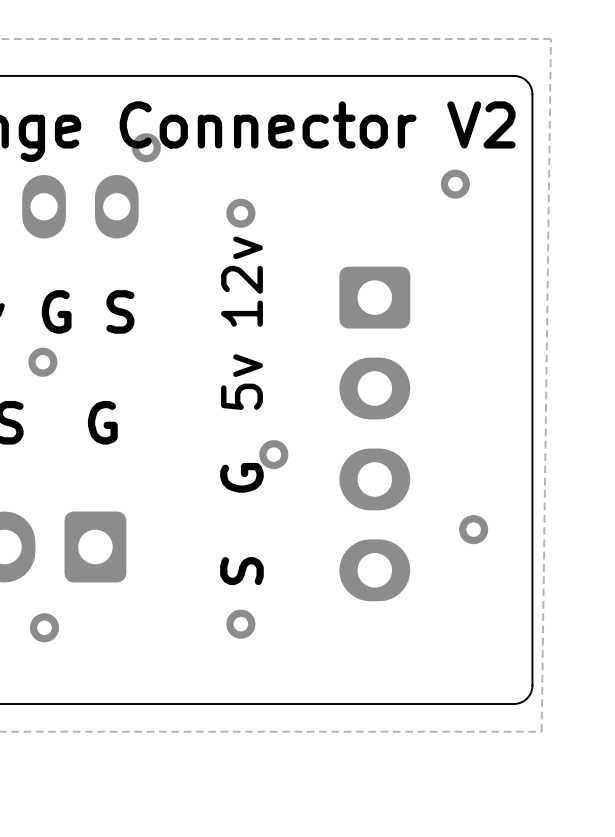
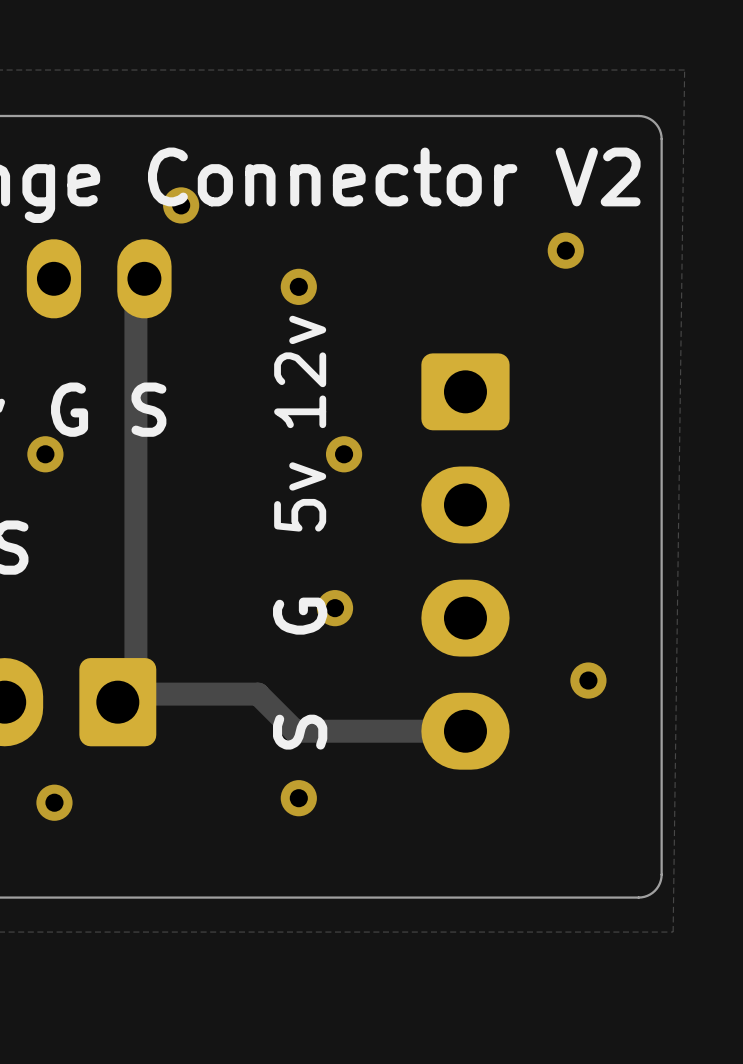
track: none -> (135, 309) (135, 694) (258, 694) (295, 731) (465, 731)
via: none -> (344, 454)
via position: (42, 362) -> (45, 454)
text: G (102, 422) -> none
via position: (273, 454) -> (335, 608)

